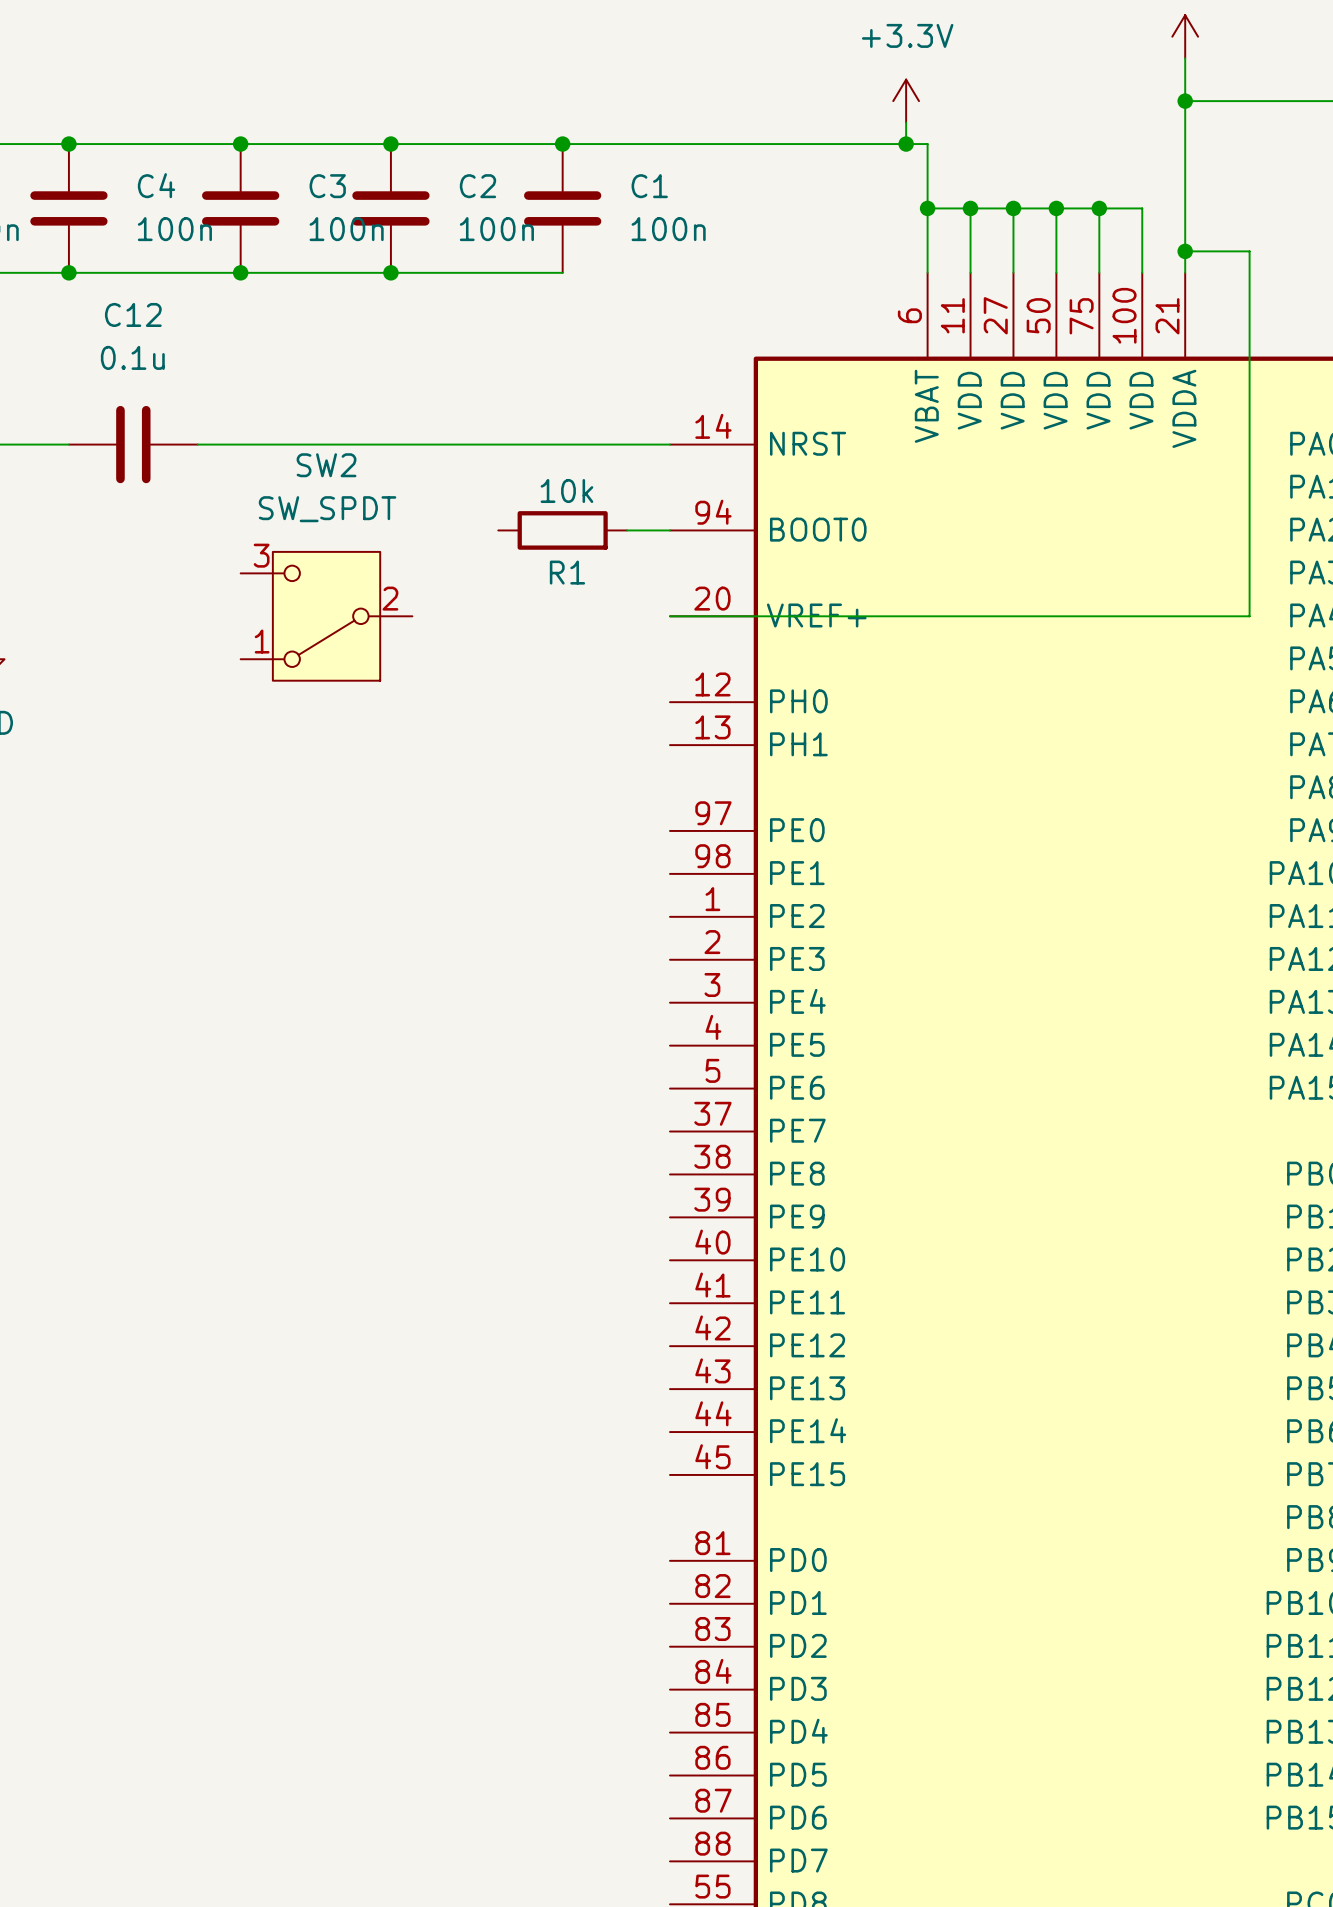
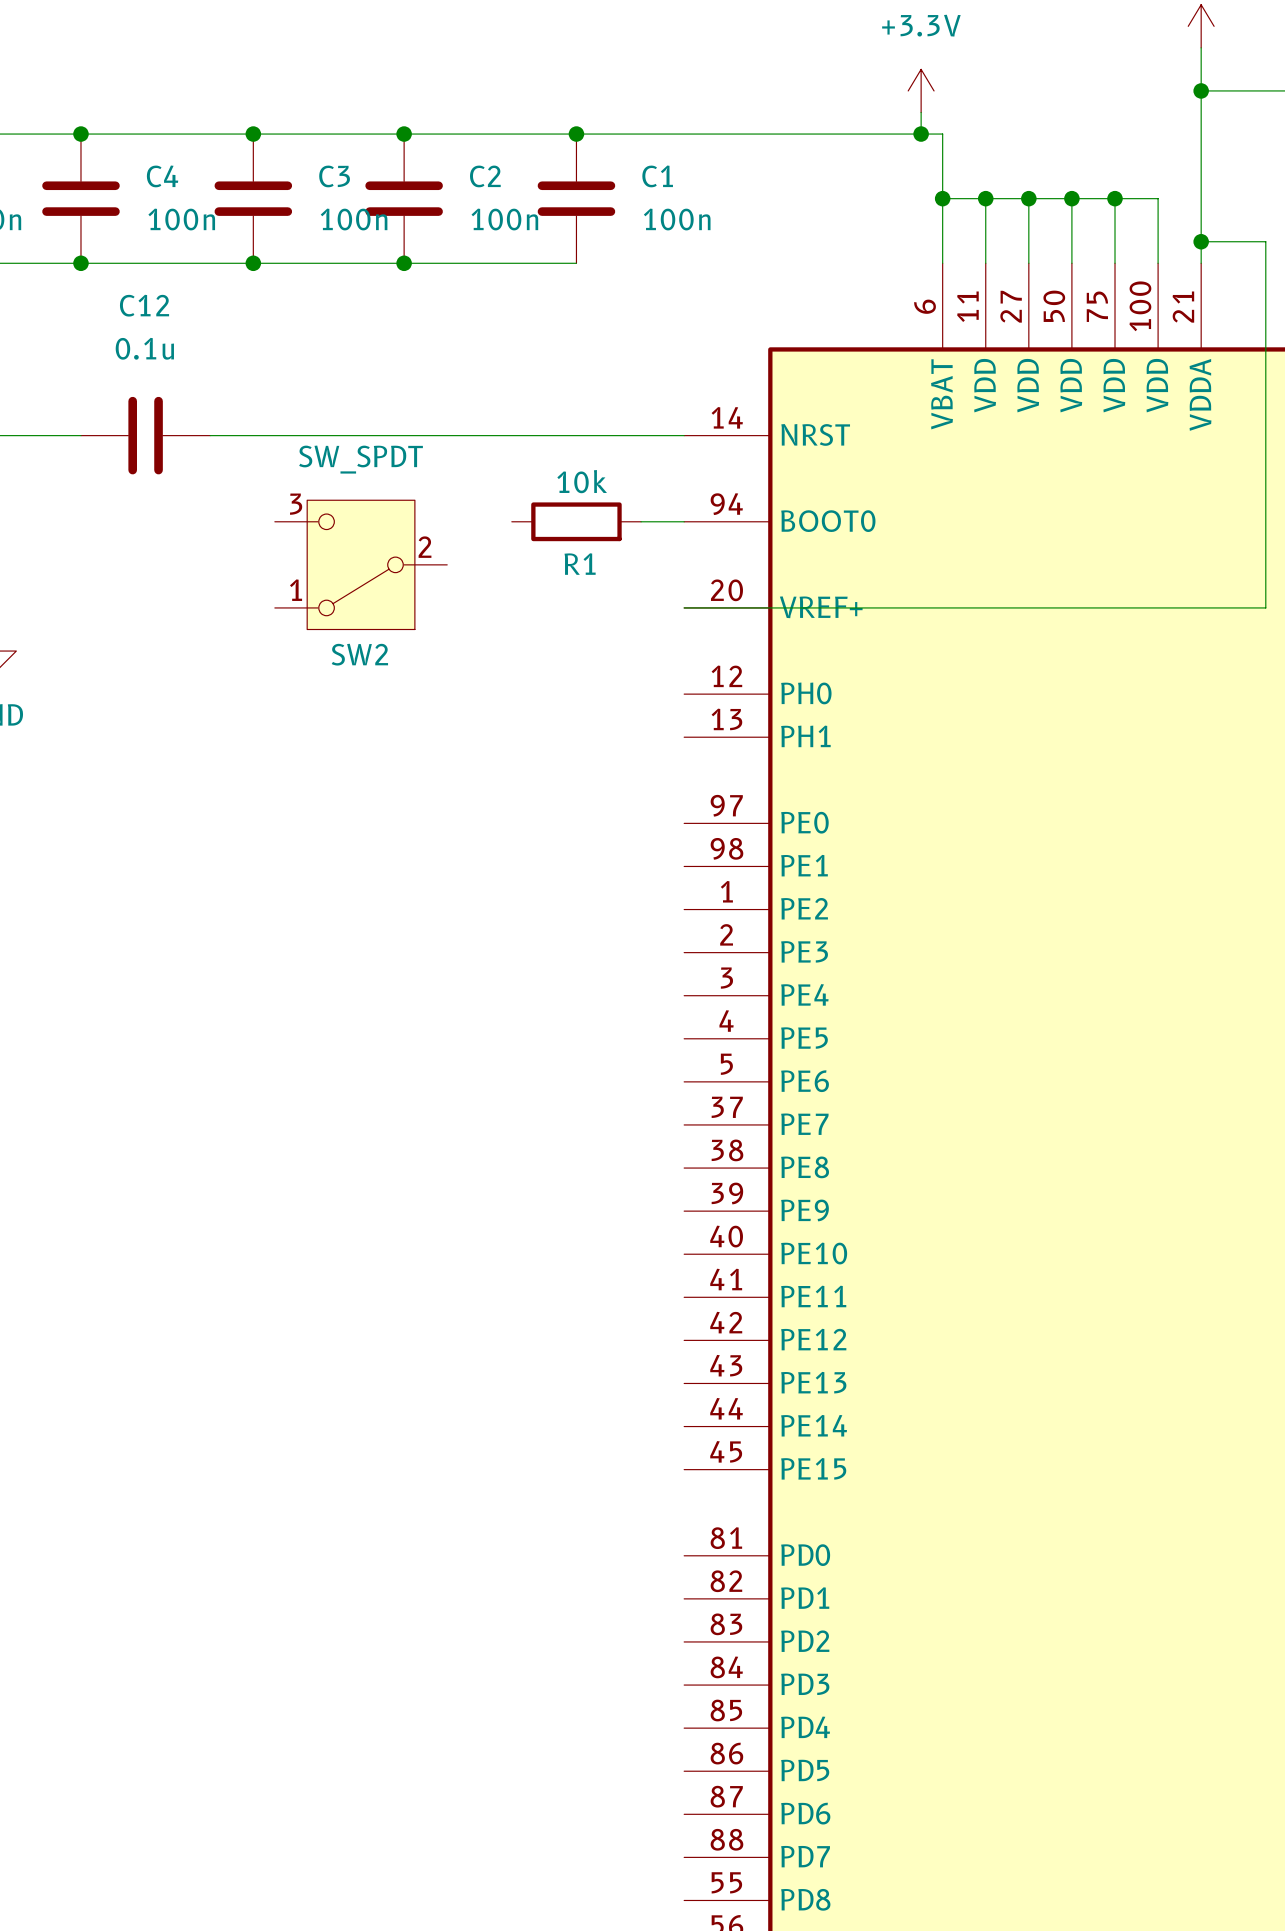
SW2 name position: SW2 (326, 465) -> SW2 (359, 654)
SW2 position: (326, 616) -> (361, 564)

